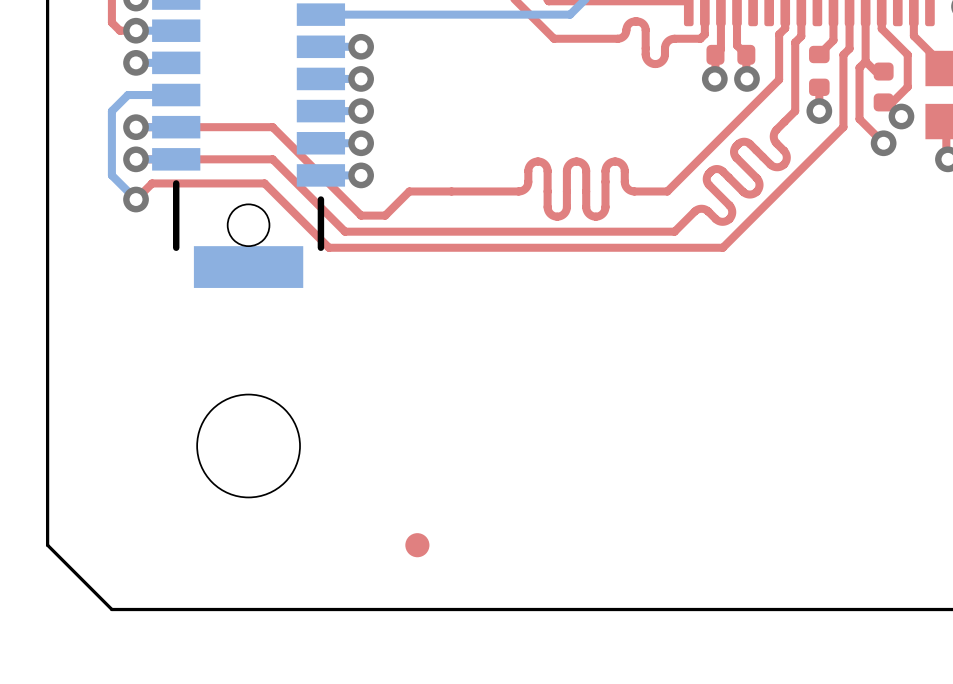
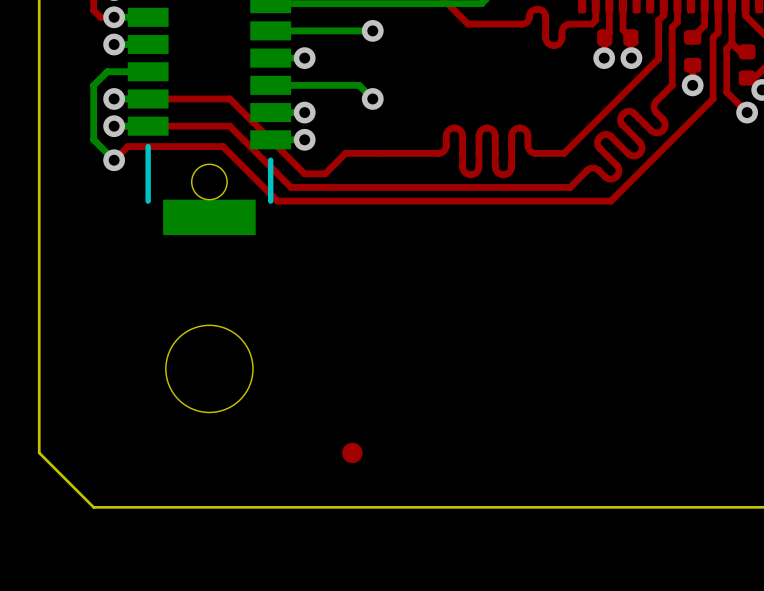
via: (361, 46) -> none
bottom track: none -> (372, 30) (304, 30)
via: none -> (372, 30)
bottom track: none -> (304, 85) (359, 85) (372, 98)
via: (361, 111) -> none
via: none -> (372, 98)

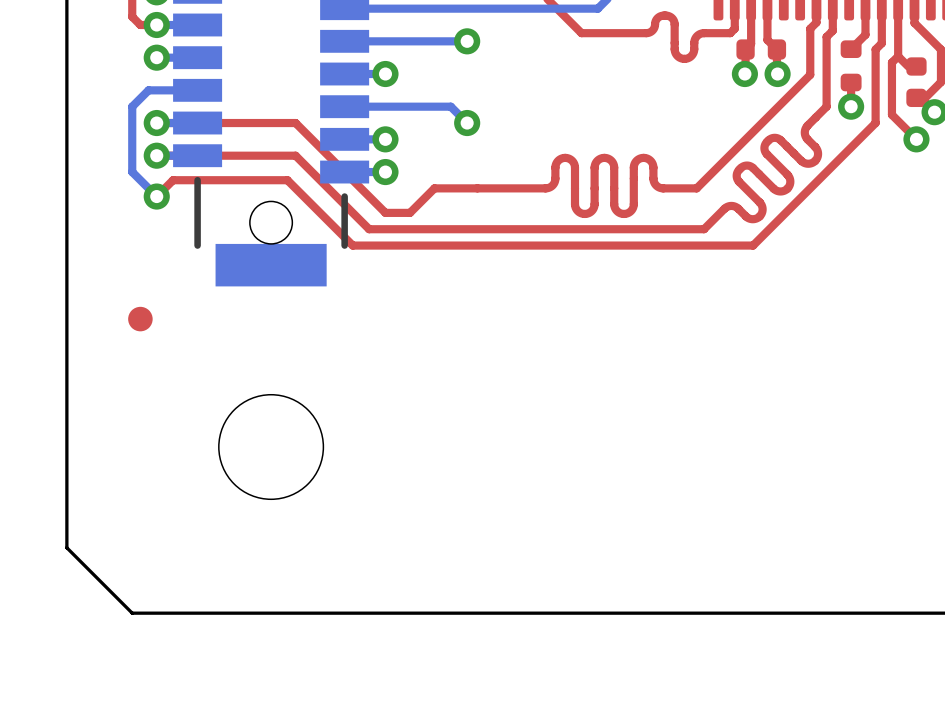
part position: (352, 452) -> (140, 319)

